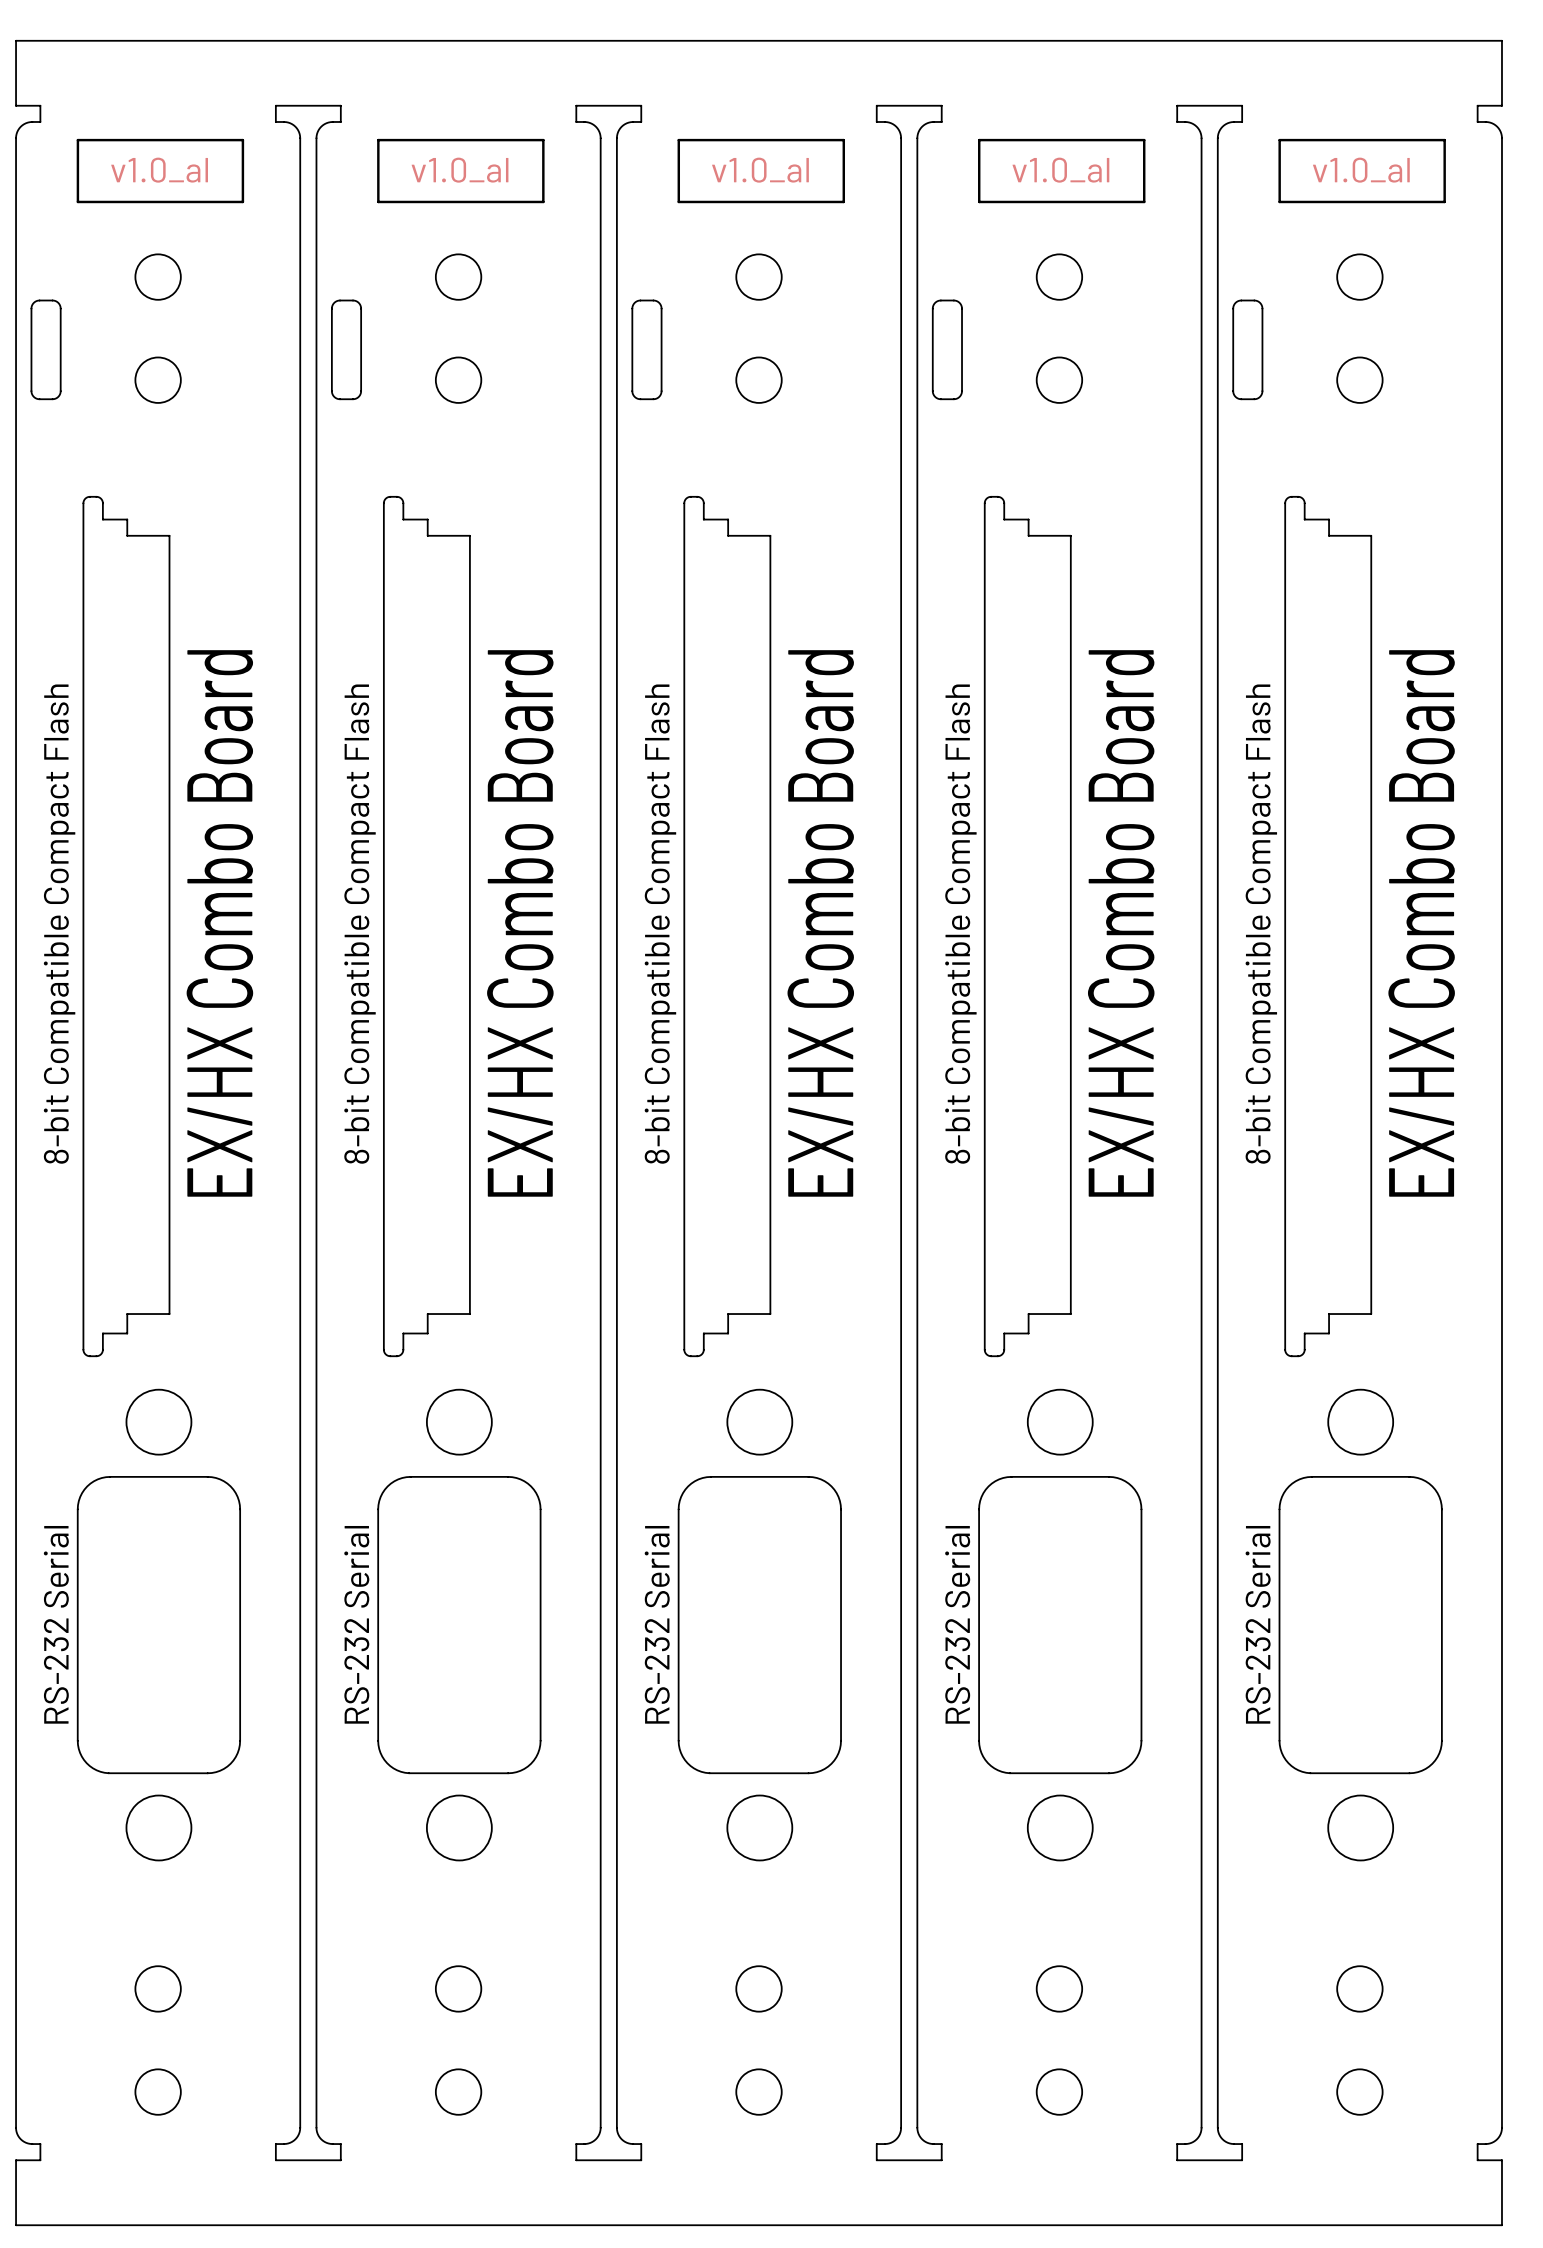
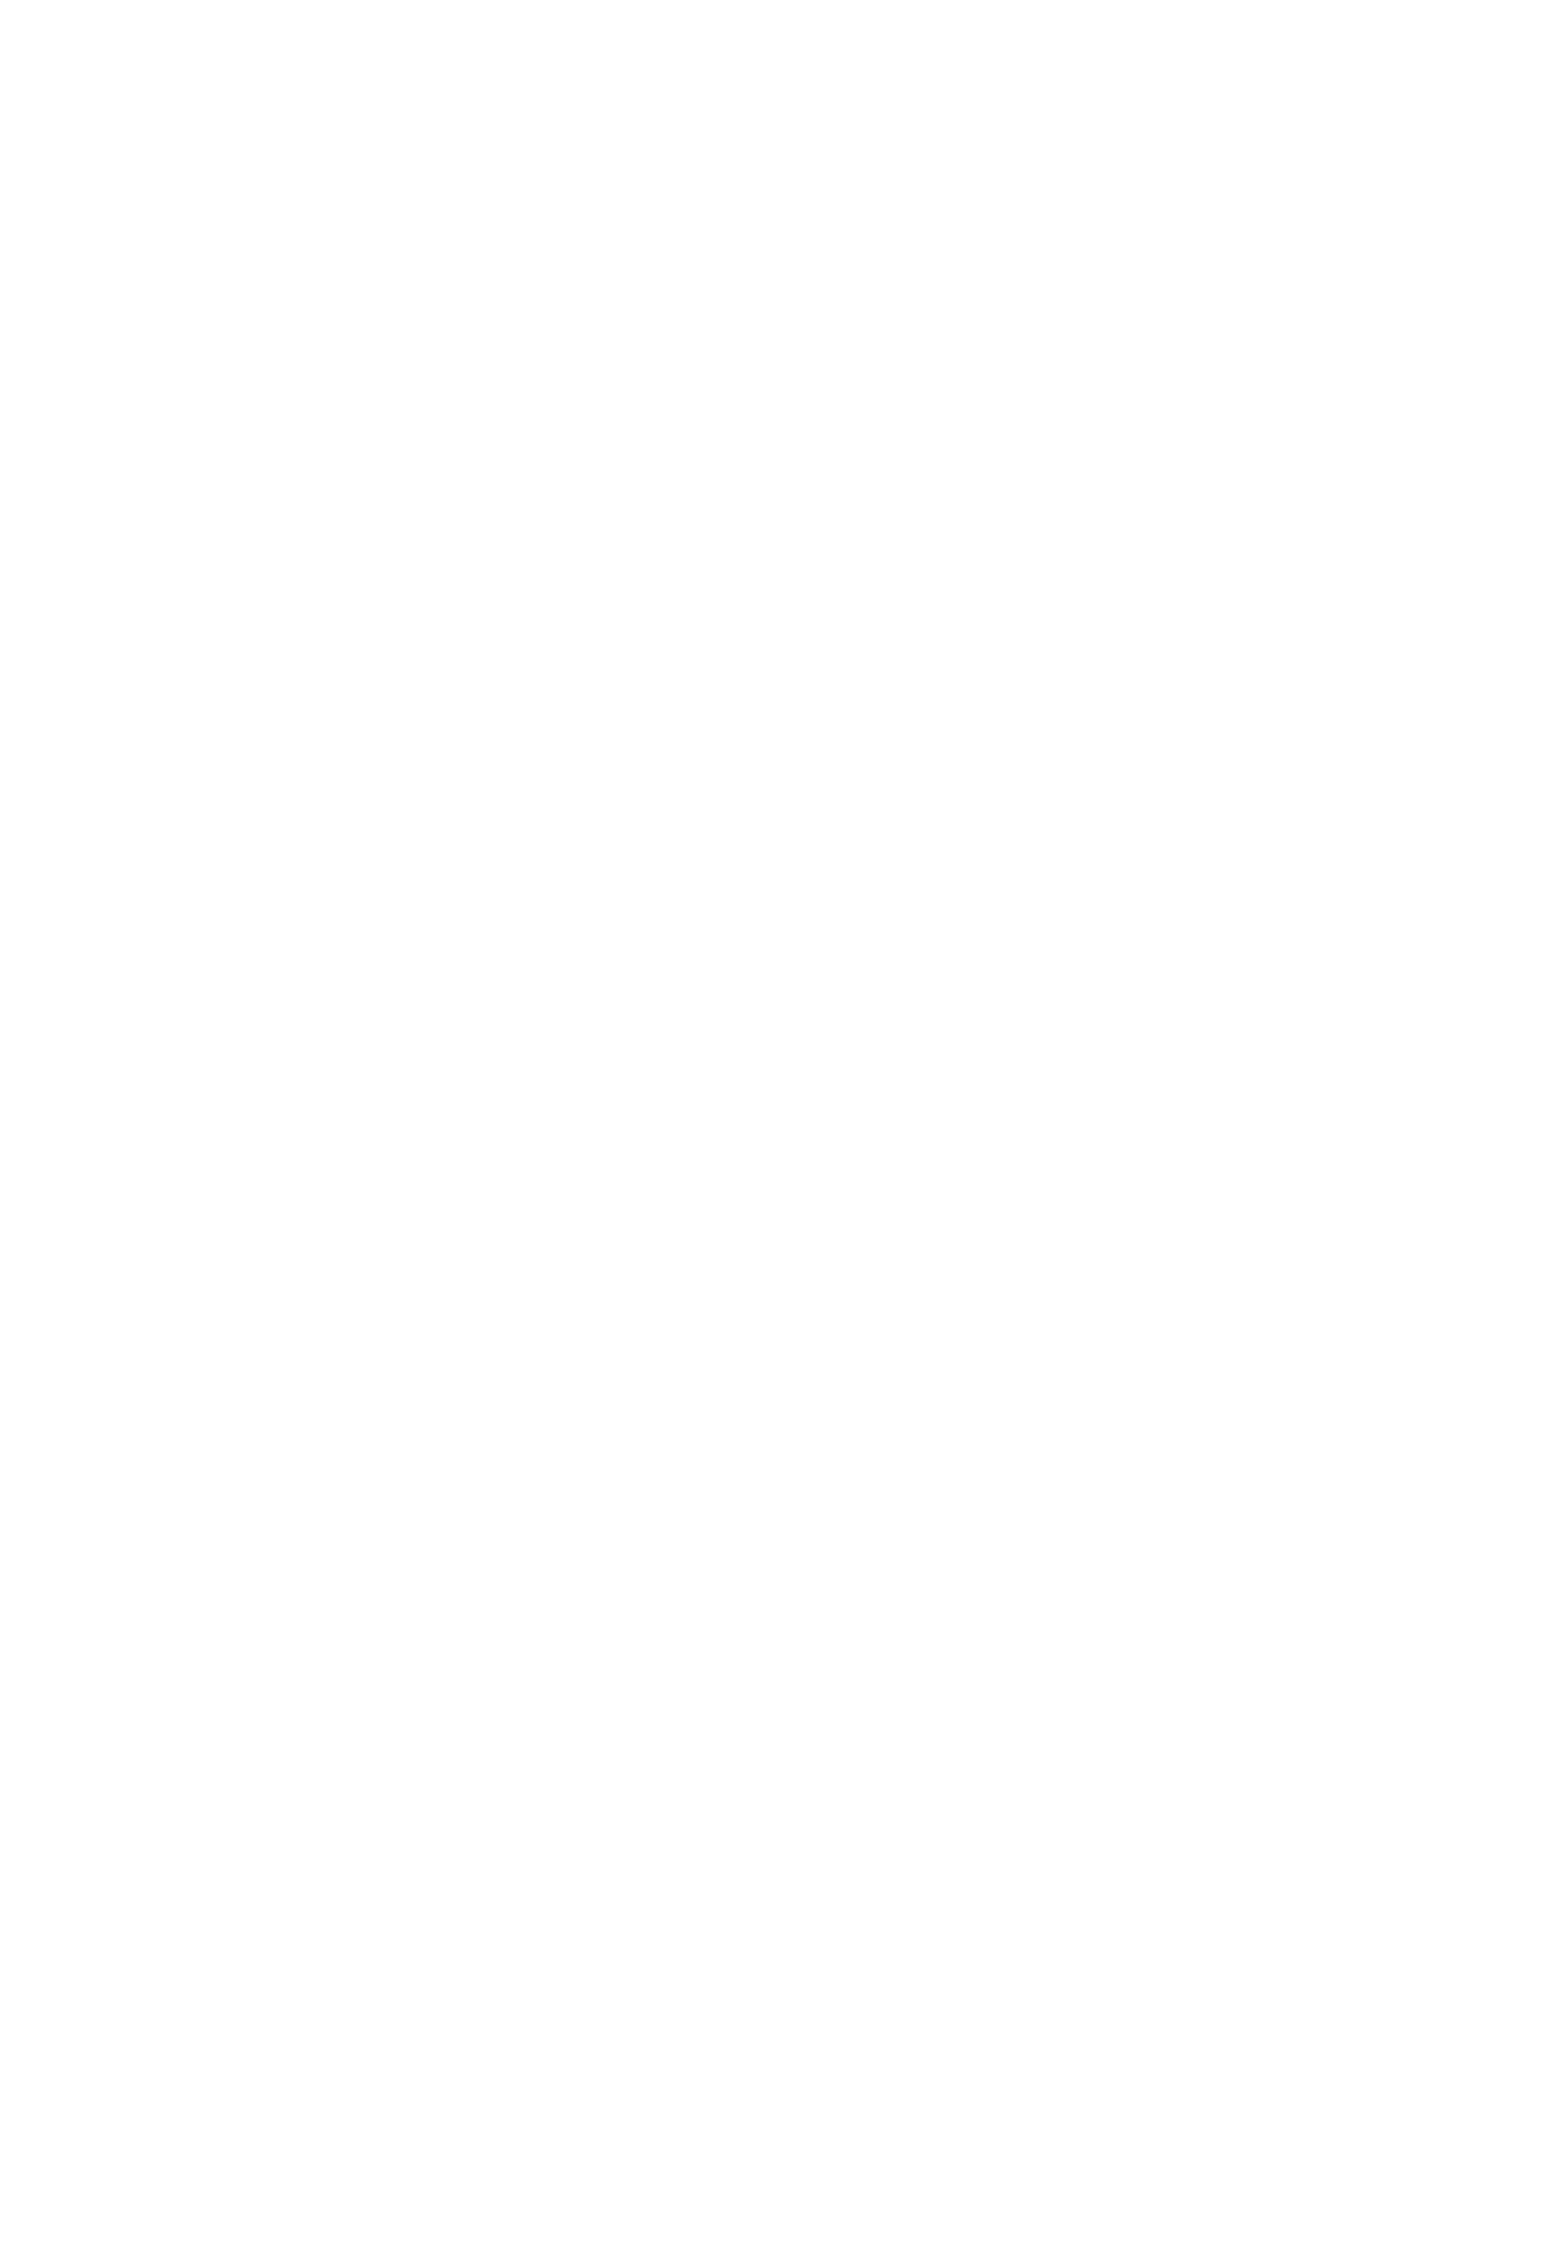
board edge: (16, 40) (16, 105) (40, 105) (40, 121) (24, 124) (18, 130) (16, 138) (16, 2127) (18, 2135) (24, 2141) (40, 2144) (40, 2160) (16, 2160) (16, 2225) (1501, 2225) (1501, 2160) (1477, 2160) (1477, 2144) (1493, 2141) (1499, 2135) (1501, 2127) (1501, 138) (1499, 130) (1493, 124) (1477, 121) (1477, 105) (1501, 105) (1501, 40) (16, 40) -> none
board edge: (275, 105) (275, 121) (292, 124) (298, 130) (300, 138) (300, 2127) (298, 2135) (292, 2141) (275, 2144) (275, 2160) (340, 2160) (340, 2144) (324, 2141) (318, 2135) (316, 2127) (316, 138) (318, 130) (324, 124) (340, 121) (340, 105) (275, 105) -> none
board edge: (576, 105) (576, 121) (592, 124) (598, 130) (600, 138) (600, 2127) (598, 2135) (592, 2141) (576, 2144) (576, 2160) (641, 2160) (641, 2144) (625, 2141) (619, 2135) (616, 2127) (616, 138) (619, 130) (625, 124) (641, 121) (641, 105) (576, 105) -> none
board edge: (876, 105) (876, 121) (892, 124) (898, 130) (901, 138) (901, 2127) (898, 2135) (892, 2141) (876, 2144) (876, 2160) (941, 2160) (941, 2144) (925, 2141) (919, 2135) (917, 2127) (917, 138) (919, 130) (925, 124) (941, 121) (941, 105) (876, 105) -> none
board edge: (1177, 105) (1177, 121) (1193, 124) (1199, 130) (1201, 138) (1201, 2127) (1199, 2135) (1193, 2141) (1177, 2144) (1177, 2160) (1242, 2160) (1242, 2144) (1225, 2141) (1219, 2135) (1217, 2127) (1217, 138) (1219, 130) (1225, 124) (1242, 121) (1242, 105) (1177, 105) -> none
line: (77, 140) (242, 140) (242, 201) (77, 201) (77, 140) -> none
line: (378, 140) (543, 140) (543, 201) (378, 201) (378, 140) -> none
line: (678, 140) (843, 140) (843, 201) (678, 201) (678, 140) -> none
line: (979, 140) (1144, 140) (1144, 201) (979, 201) (979, 140) -> none
line: (1279, 140) (1279, 201) (1444, 201) (1444, 140) (1279, 140) -> none
text: v1.0_al (159, 170) -> none
text: v1.0_al (460, 170) -> none
text: v1.0_al (760, 170) -> none
text: v1.0_al (1060, 170) -> none
text: v1.0_al (1361, 170) -> none
round board edge: [134, 253, 182, 301] -> none
round board edge: [435, 253, 483, 301] -> none
round board edge: [735, 253, 783, 301] -> none
round board edge: [1035, 253, 1084, 301] -> none
round board edge: [1336, 253, 1384, 301] -> none
board edge: (39, 300) (54, 300) (60, 307) (60, 392) (58, 396) (53, 399) (37, 398) (31, 392) (31, 307) (33, 302) (39, 300) -> none
board edge: (340, 300) (355, 300) (361, 307) (361, 392) (358, 396) (354, 399) (337, 398) (331, 392) (331, 307) (334, 302) (340, 300) -> none
board edge: (640, 300) (655, 300) (661, 307) (661, 392) (659, 396) (654, 399) (638, 398) (632, 392) (632, 307) (634, 302) (640, 300) -> none
board edge: (940, 300) (955, 300) (961, 307) (961, 392) (959, 396) (954, 399) (938, 398) (932, 392) (932, 307) (935, 302) (940, 300) -> none
board edge: (1241, 300) (1256, 300) (1262, 307) (1262, 392) (1260, 396) (1255, 399) (1239, 398) (1233, 392) (1233, 307) (1235, 302) (1241, 300) -> none
round board edge: [134, 356, 182, 404] -> none
round board edge: [435, 356, 483, 404] -> none
round board edge: [735, 356, 783, 404] -> none
round board edge: [1035, 356, 1084, 404] -> none
round board edge: [1336, 356, 1384, 404] -> none
board edge: (89, 496) (98, 497) (102, 500) (102, 519) (127, 519) (127, 535) (169, 535) (169, 1314) (127, 1314) (127, 1333) (102, 1333) (102, 1351) (96, 1356) (86, 1355) (83, 1349) (83, 503) (85, 498) (89, 496) -> none
board edge: (390, 496) (398, 497) (402, 500) (403, 519) (427, 519) (427, 535) (469, 535) (469, 1314) (427, 1314) (427, 1333) (403, 1333) (403, 1351) (396, 1356) (387, 1355) (383, 1349) (383, 503) (385, 498) (390, 496) -> none
board edge: (690, 496) (698, 497) (702, 500) (703, 519) (728, 519) (728, 535) (770, 535) (770, 1314) (728, 1314) (728, 1333) (703, 1333) (703, 1351) (697, 1356) (687, 1355) (684, 1349) (684, 503) (686, 498) (690, 496) -> none
board edge: (991, 496) (999, 497) (1003, 500) (1004, 519) (1028, 519) (1028, 535) (1070, 535) (1070, 1314) (1028, 1314) (1028, 1333) (1004, 1333) (1004, 1351) (997, 1356) (987, 1355) (984, 1349) (984, 503) (986, 498) (991, 496) -> none
board edge: (1291, 496) (1299, 497) (1303, 500) (1304, 519) (1329, 519) (1329, 535) (1371, 535) (1371, 1314) (1329, 1314) (1329, 1333) (1304, 1333) (1304, 1351) (1298, 1356) (1288, 1355) (1285, 1349) (1285, 503) (1287, 498) (1291, 496) -> none
text: EX/HX Combo Board (219, 923) -> none
text: EX/HX Combo Board (520, 923) -> none
text: EX/HX Combo Board (820, 923) -> none
text: EX/HX Combo Board (1121, 923) -> none
text: EX/HX Combo Board (1421, 923) -> none
text: 8-bit Compatible Compact Flash (59, 924) -> none
text: 8-bit Compatible Compact Flash (360, 924) -> none
text: 8-bit Compatible Compact Flash (660, 924) -> none
text: 8-bit Compatible Compact Flash (960, 924) -> none
text: 8-bit Compatible Compact Flash (1261, 924) -> none
round board edge: [125, 1388, 193, 1456] -> none
round board edge: [426, 1388, 493, 1456] -> none
round board edge: [726, 1388, 794, 1456] -> none
round board edge: [1026, 1388, 1094, 1456] -> none
round board edge: [1327, 1388, 1394, 1456] -> none
board edge: (110, 1476) (211, 1477) (227, 1483) (237, 1496) (240, 1509) (240, 1740) (237, 1753) (233, 1760) (220, 1770) (207, 1773) (104, 1772) (89, 1765) (80, 1752) (77, 1740) (78, 1505) (80, 1496) (87, 1486) (97, 1479) (110, 1476) -> none
board edge: (410, 1476) (512, 1477) (527, 1483) (538, 1496) (540, 1509) (540, 1740) (538, 1753) (533, 1760) (520, 1770) (508, 1773) (404, 1772) (390, 1765) (380, 1752) (378, 1740) (378, 1505) (380, 1496) (387, 1486) (398, 1479) (410, 1476) -> none
board edge: (711, 1476) (812, 1477) (828, 1483) (838, 1496) (841, 1509) (841, 1740) (838, 1753) (834, 1760) (820, 1770) (808, 1773) (705, 1772) (690, 1765) (680, 1752) (678, 1740) (678, 1505) (681, 1496) (688, 1486) (698, 1479) (711, 1476) -> none
board edge: (1011, 1476) (1113, 1477) (1128, 1483) (1138, 1496) (1141, 1509) (1141, 1740) (1138, 1753) (1134, 1760) (1121, 1770) (1108, 1773) (1005, 1772) (991, 1765) (981, 1752) (979, 1740) (979, 1505) (981, 1496) (988, 1486) (999, 1479) (1011, 1476) -> none
board edge: (1311, 1476) (1413, 1477) (1429, 1483) (1439, 1496) (1441, 1509) (1441, 1740) (1439, 1753) (1435, 1760) (1421, 1770) (1409, 1773) (1306, 1772) (1291, 1765) (1281, 1752) (1279, 1740) (1279, 1505) (1281, 1496) (1289, 1486) (1299, 1479) (1311, 1476) -> none
text: RS-232 Serial (56, 1624) -> none
text: RS-232 Serial (356, 1624) -> none
text: RS-232 Serial (657, 1624) -> none
text: RS-232 Serial (957, 1624) -> none
text: RS-232 Serial (1258, 1624) -> none
round board edge: [125, 1794, 193, 1862] -> none
round board edge: [426, 1794, 493, 1862] -> none
round board edge: [726, 1794, 794, 1862] -> none
round board edge: [1026, 1794, 1094, 1862] -> none
round board edge: [1327, 1794, 1394, 1862] -> none
round board edge: [134, 1965, 182, 2013] -> none
round board edge: [435, 1965, 483, 2013] -> none
round board edge: [735, 1965, 783, 2013] -> none
round board edge: [1035, 1965, 1084, 2013] -> none
round board edge: [1336, 1965, 1384, 2013] -> none
round board edge: [134, 2068, 182, 2116] -> none
round board edge: [435, 2068, 483, 2116] -> none
round board edge: [735, 2068, 783, 2116] -> none
round board edge: [1035, 2068, 1084, 2116] -> none
round board edge: [1336, 2068, 1384, 2116] -> none

